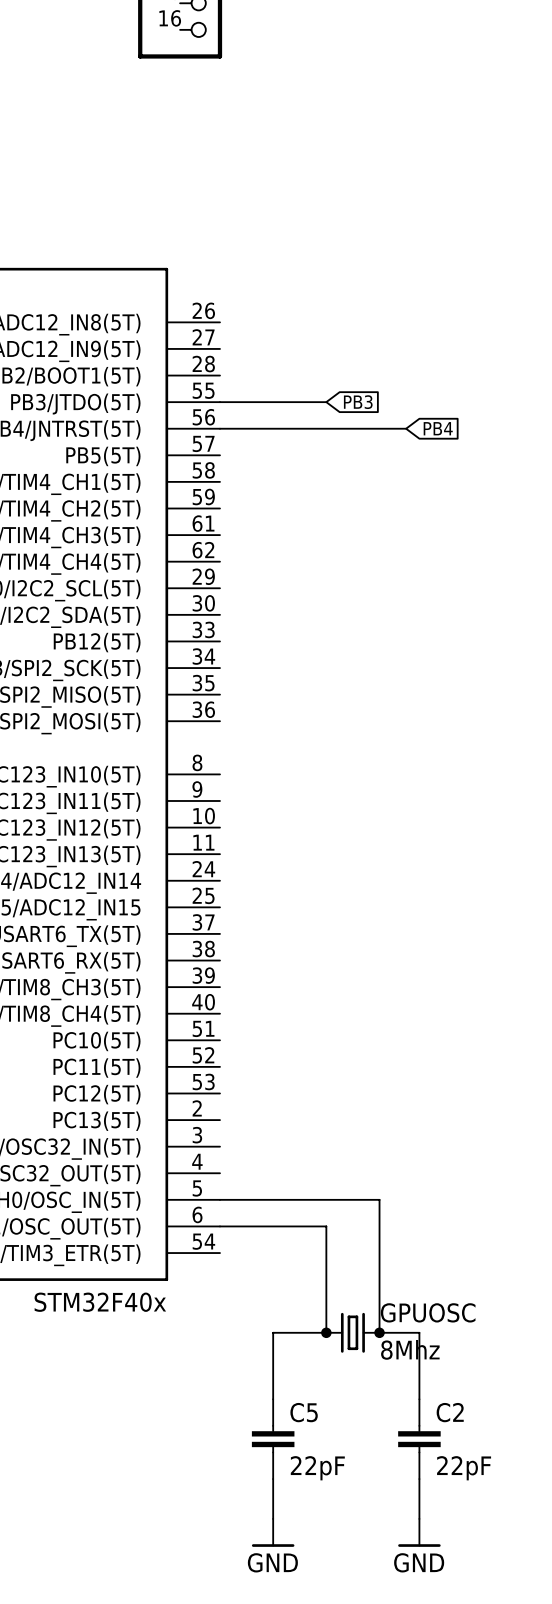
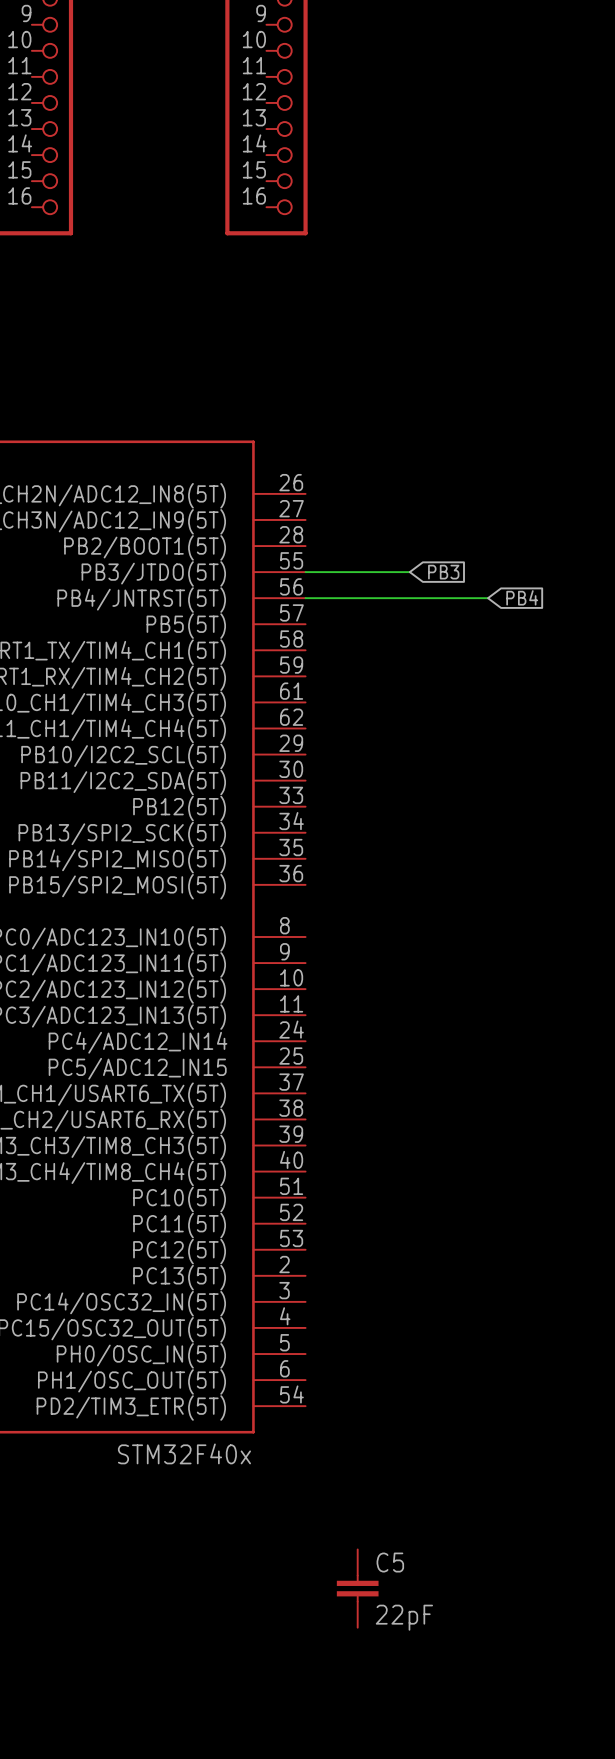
wire: (219, 1199) (379, 1199) (379, 1332) (419, 1332) (419, 1399) -> none
wire: (219, 1226) (326, 1226) (326, 1332) (273, 1332) (273, 1399) -> none
junction: (326, 1332) -> none
GPUOSC: 8Mhz (352, 1332) -> none
junction: (379, 1332) -> none
C2: 22pF (419, 1439) -> none
wire: (273, 1479) (273, 1518) -> none
wire: (419, 1479) (419, 1518) -> none
power symbol: GND (273, 1532) -> none
power symbol: GND (419, 1532) -> none

